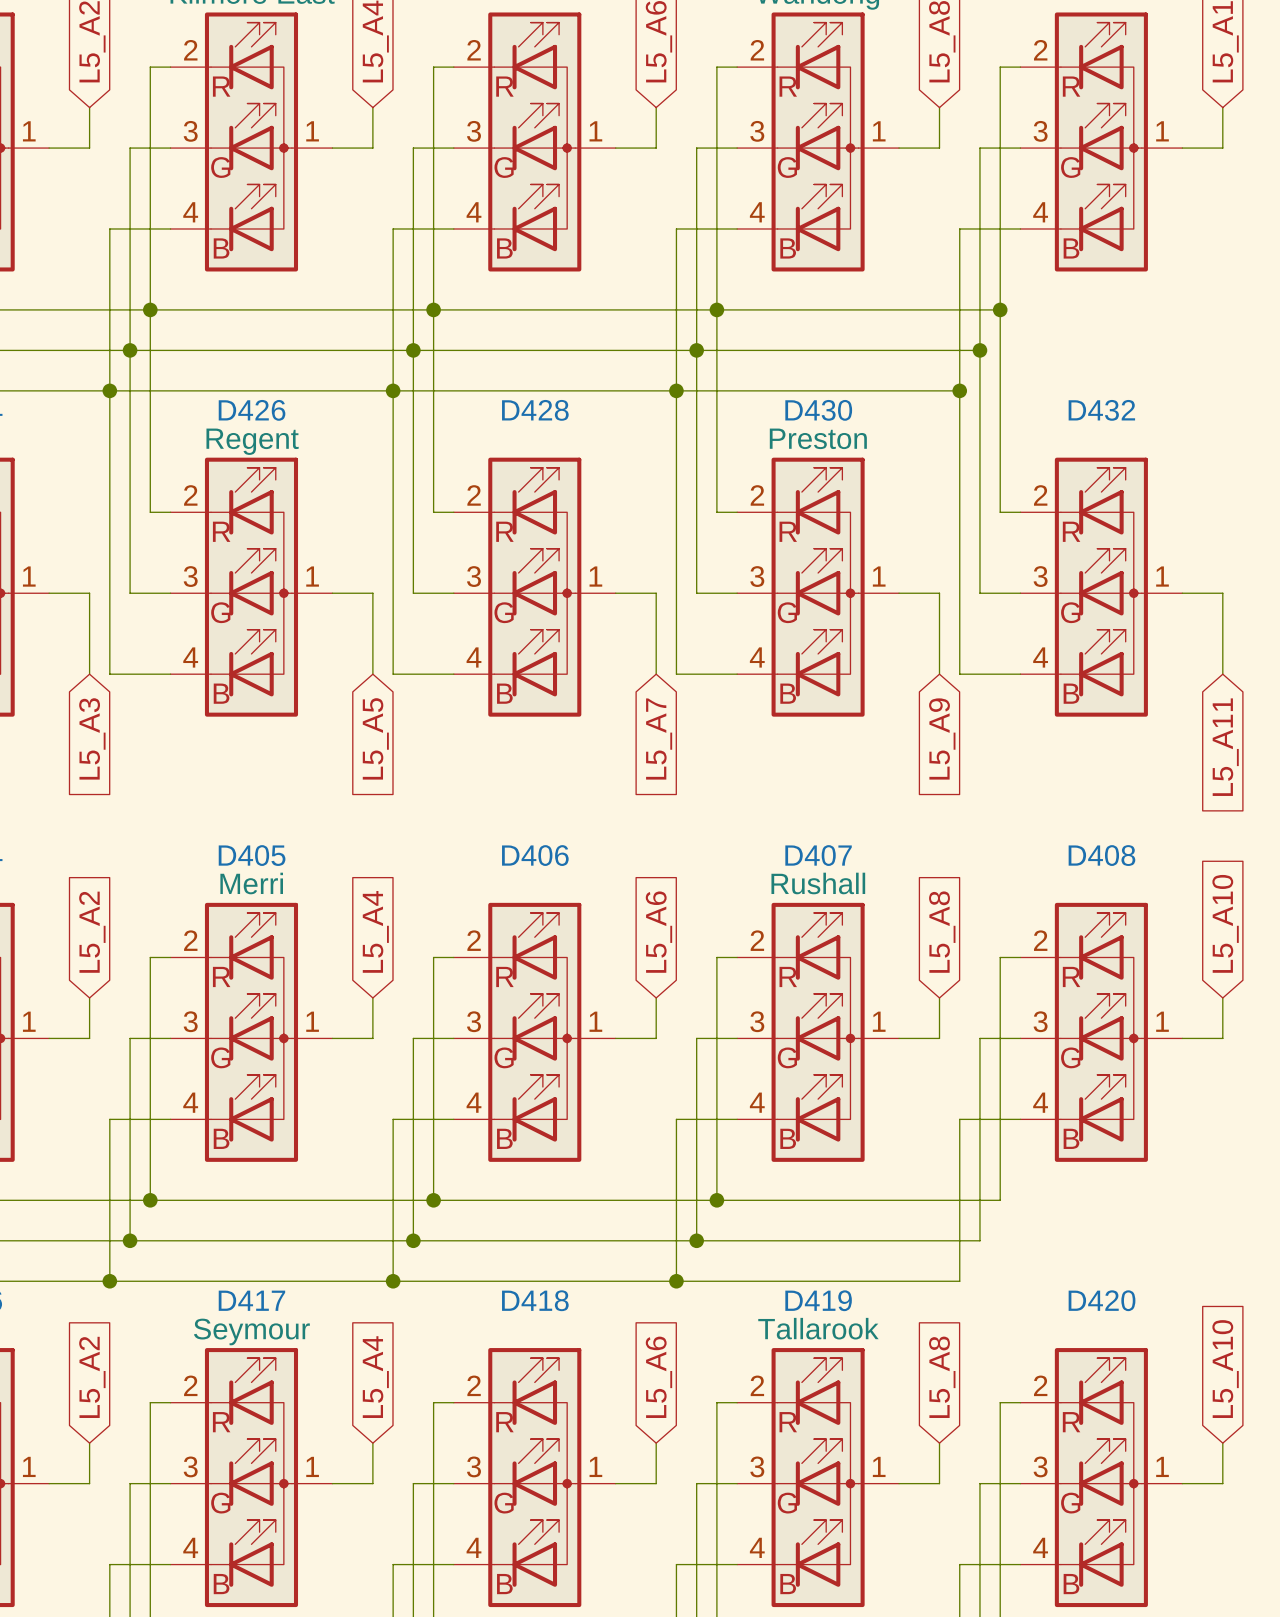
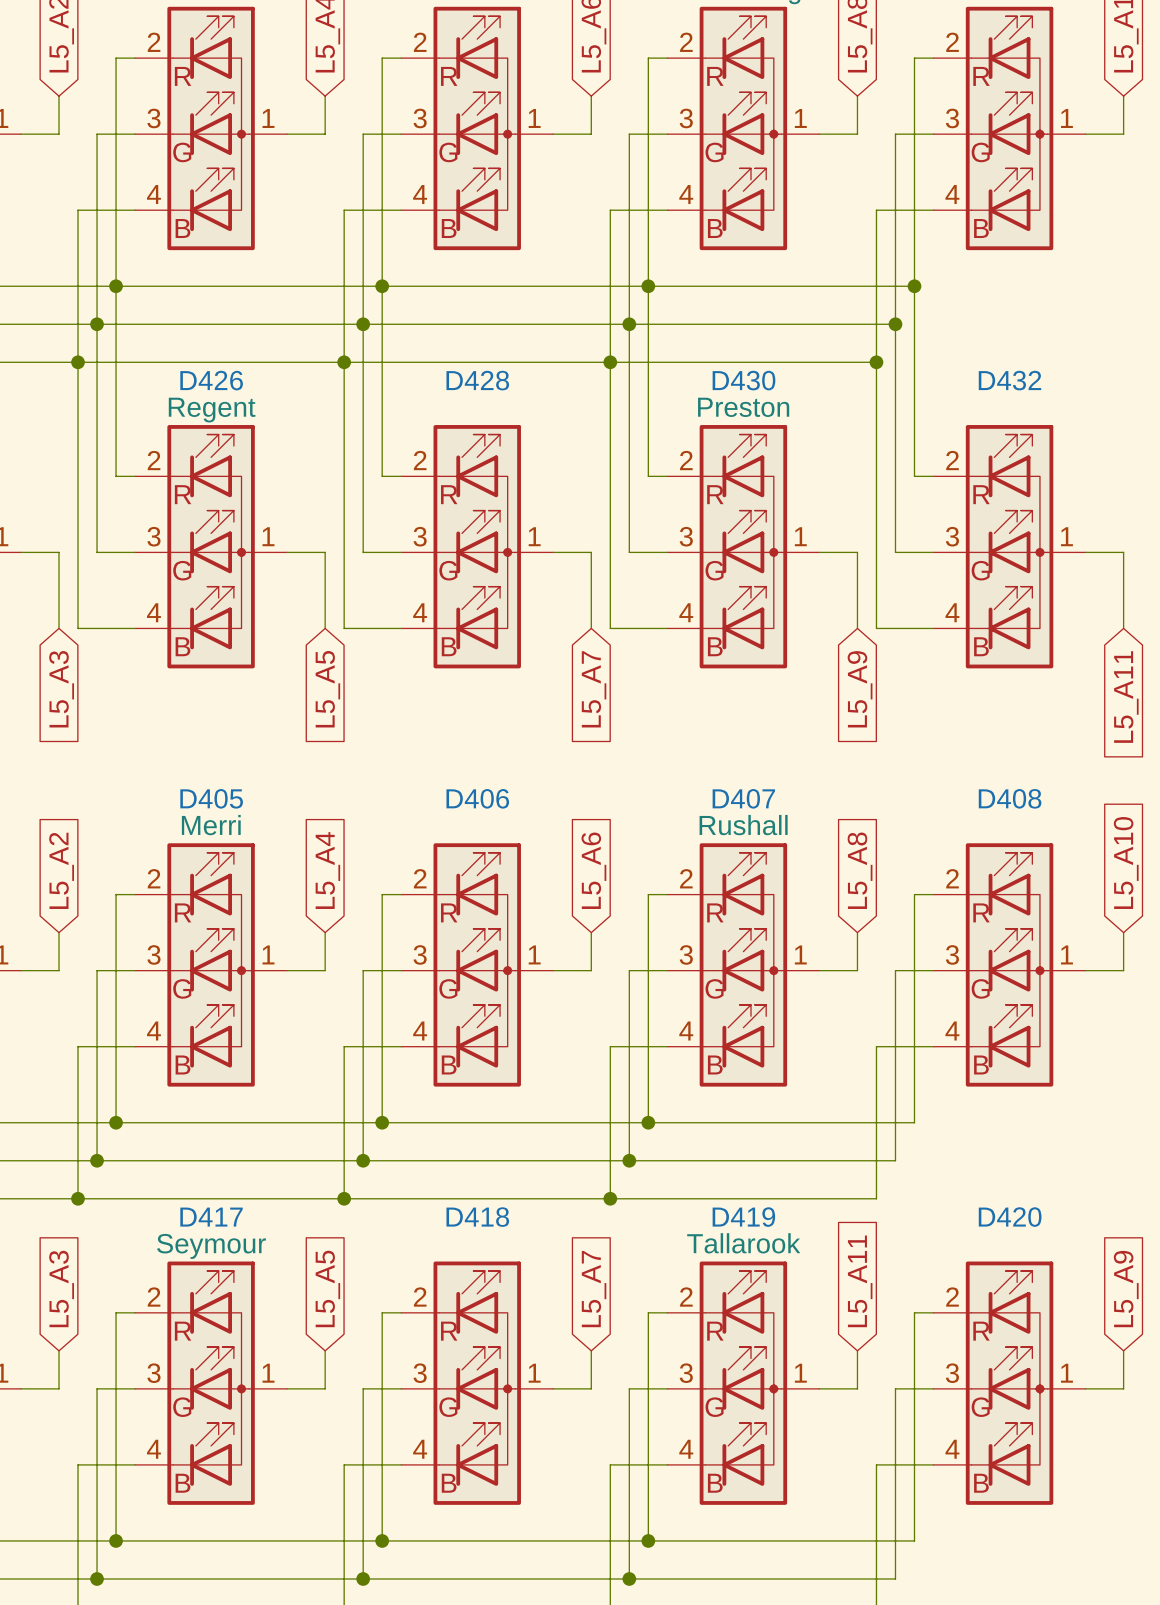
global label: L5_A10 (1225, 1369) -> L5_A9 (1126, 1289)
global label: L5_A2 (92, 1377) -> L5_A3 (61, 1289)
global label: L5_A4 (375, 1377) -> L5_A5 (327, 1288)
global label: L5_A6 (658, 1377) -> L5_A7 (594, 1289)
global label: L5_A8 (942, 1377) -> L5_A11 (860, 1281)

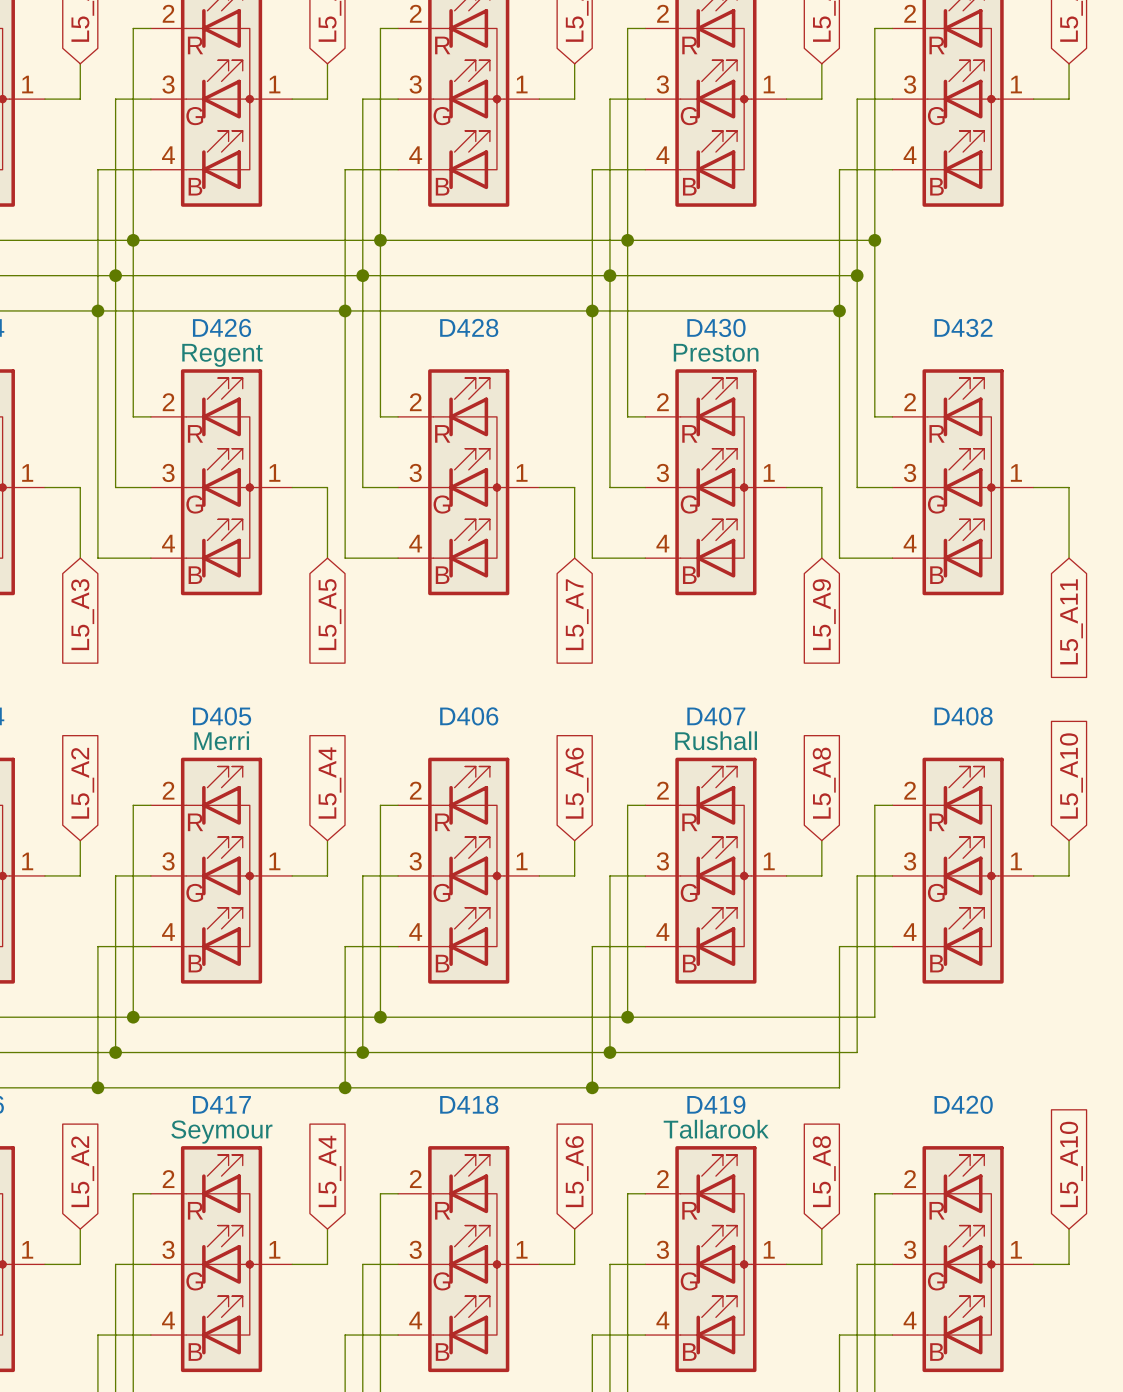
global label: L5_A11 (860, 1281) -> L5_A8 (824, 1171)
global label: L5_A5 (327, 1288) -> L5_A4 (330, 1171)
global label: L5_A3 (61, 1289) -> L5_A2 (82, 1171)
global label: L5_A7 (594, 1289) -> L5_A6 (577, 1171)
global label: L5_A9 (1126, 1289) -> L5_A10 (1071, 1164)

